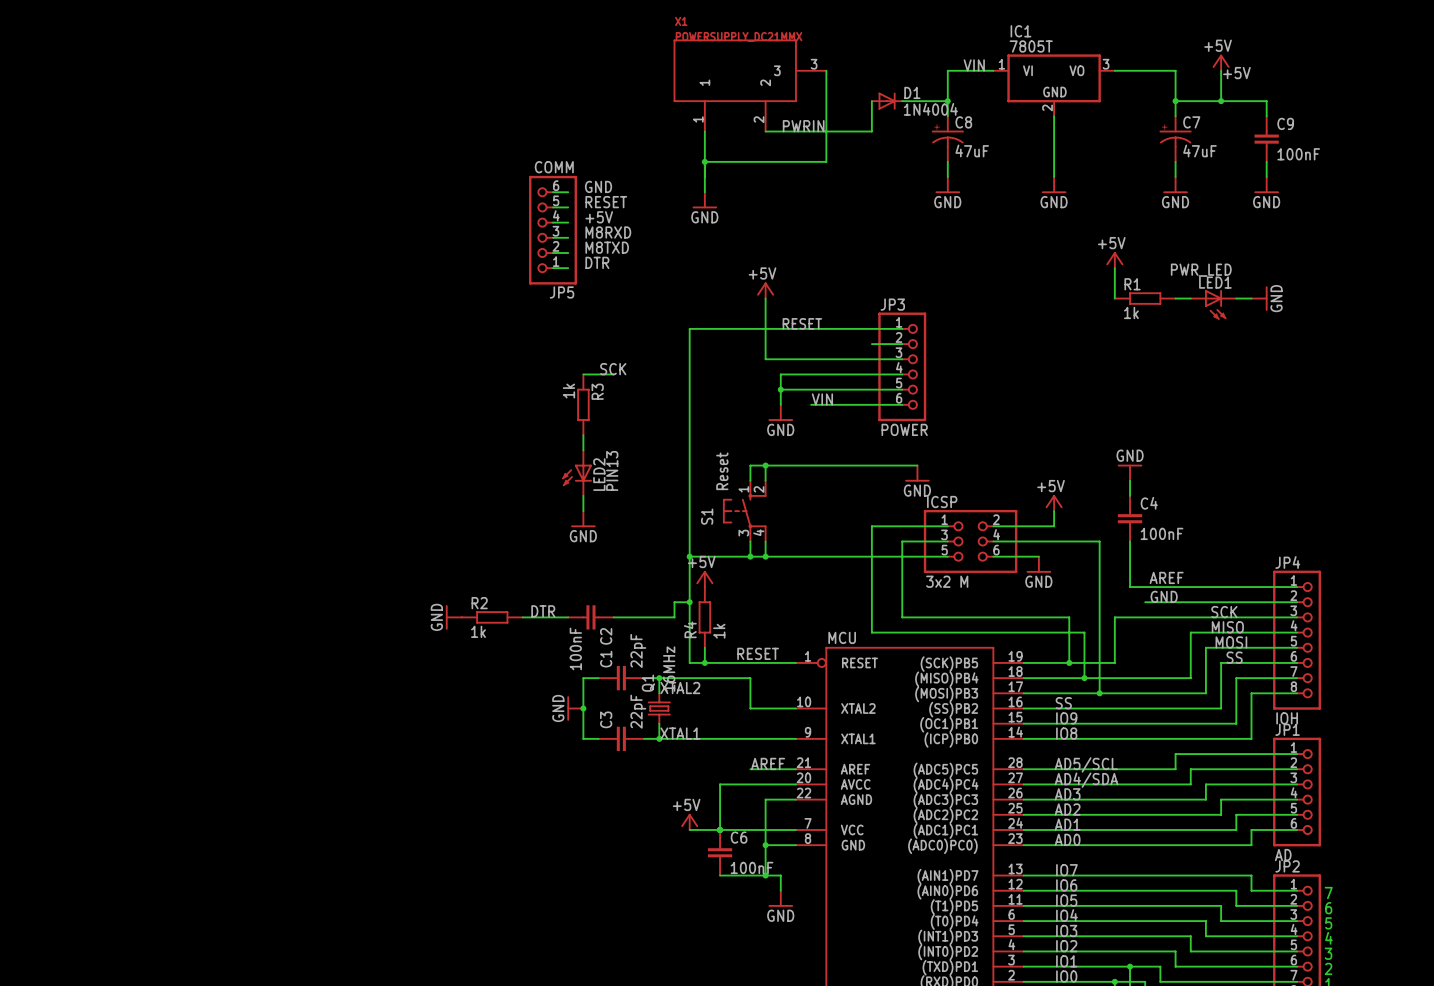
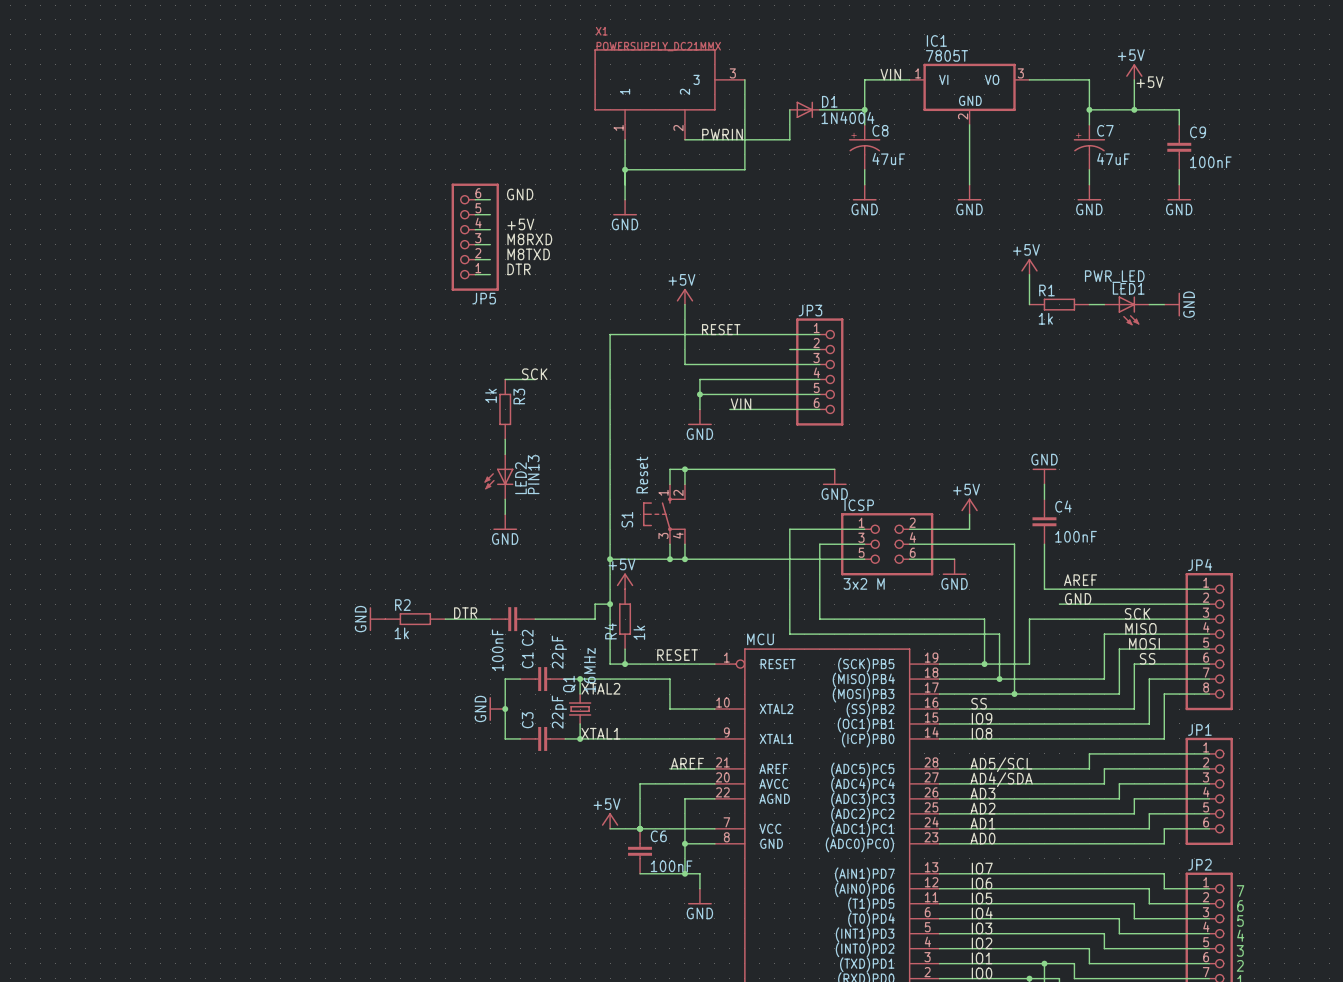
JP5 value: COMM (554, 167) -> none
label: RESET (606, 202) -> none
JP3 value: POWER (904, 429) -> none
JP4 value: IOH (1287, 718) -> none
JP1 value: AD (1283, 855) -> none

